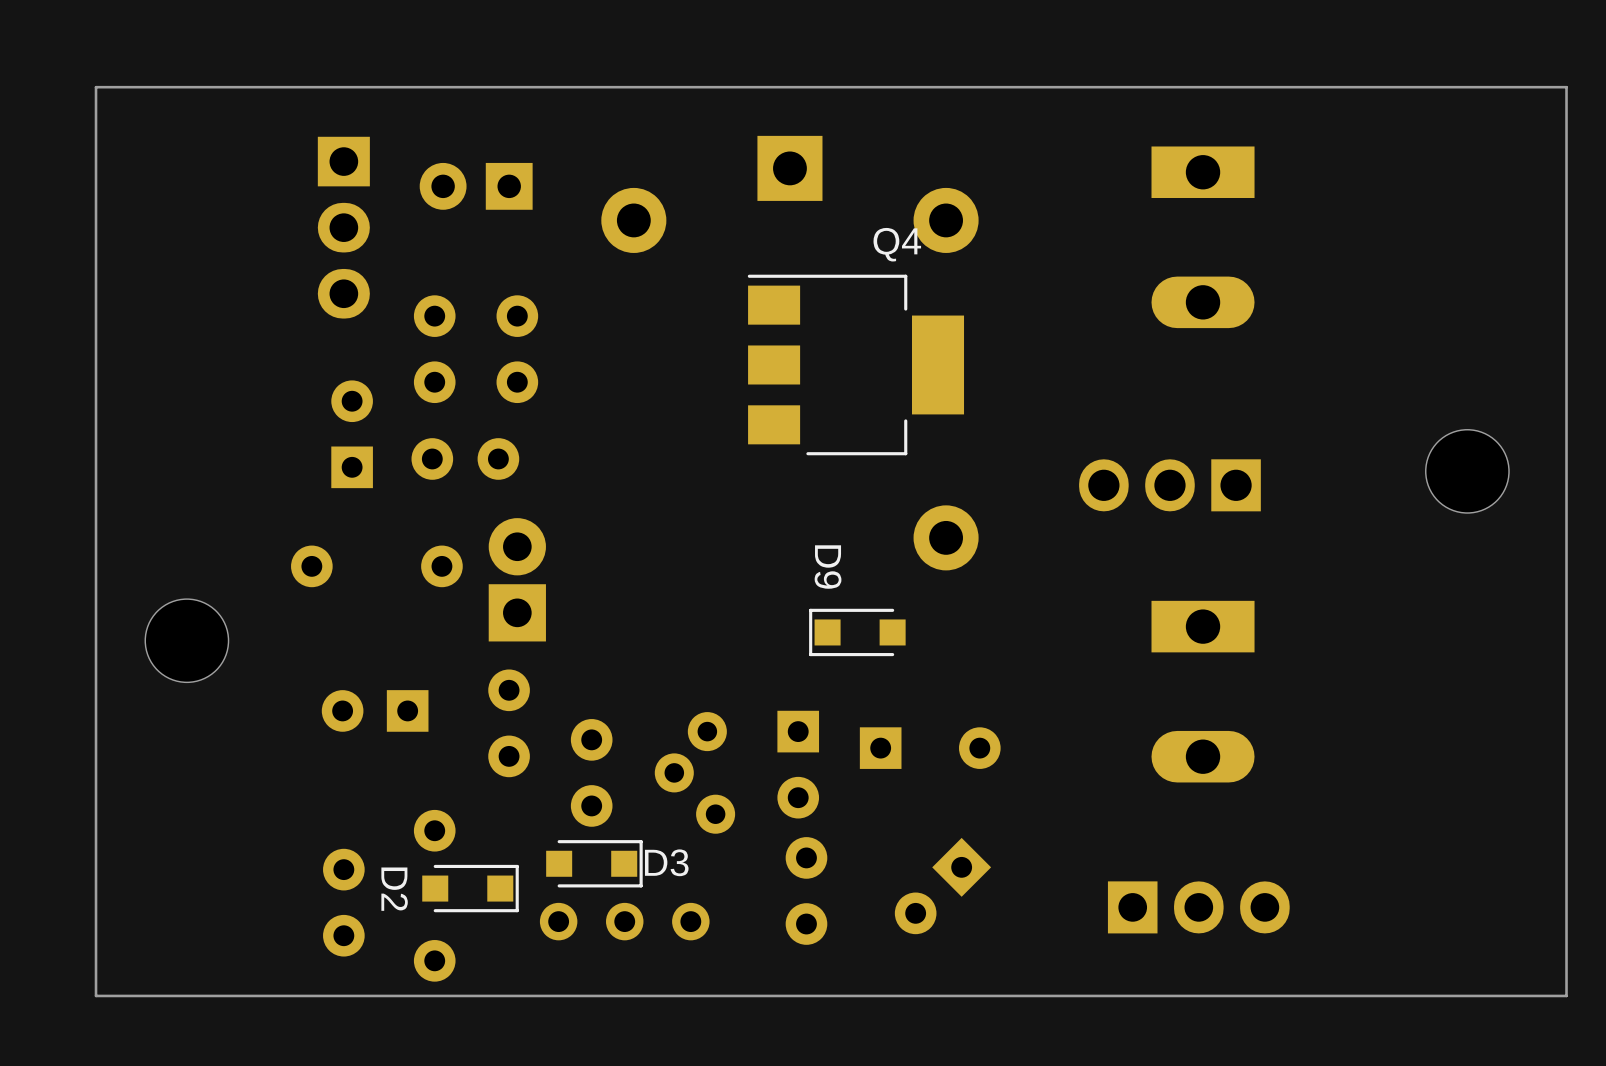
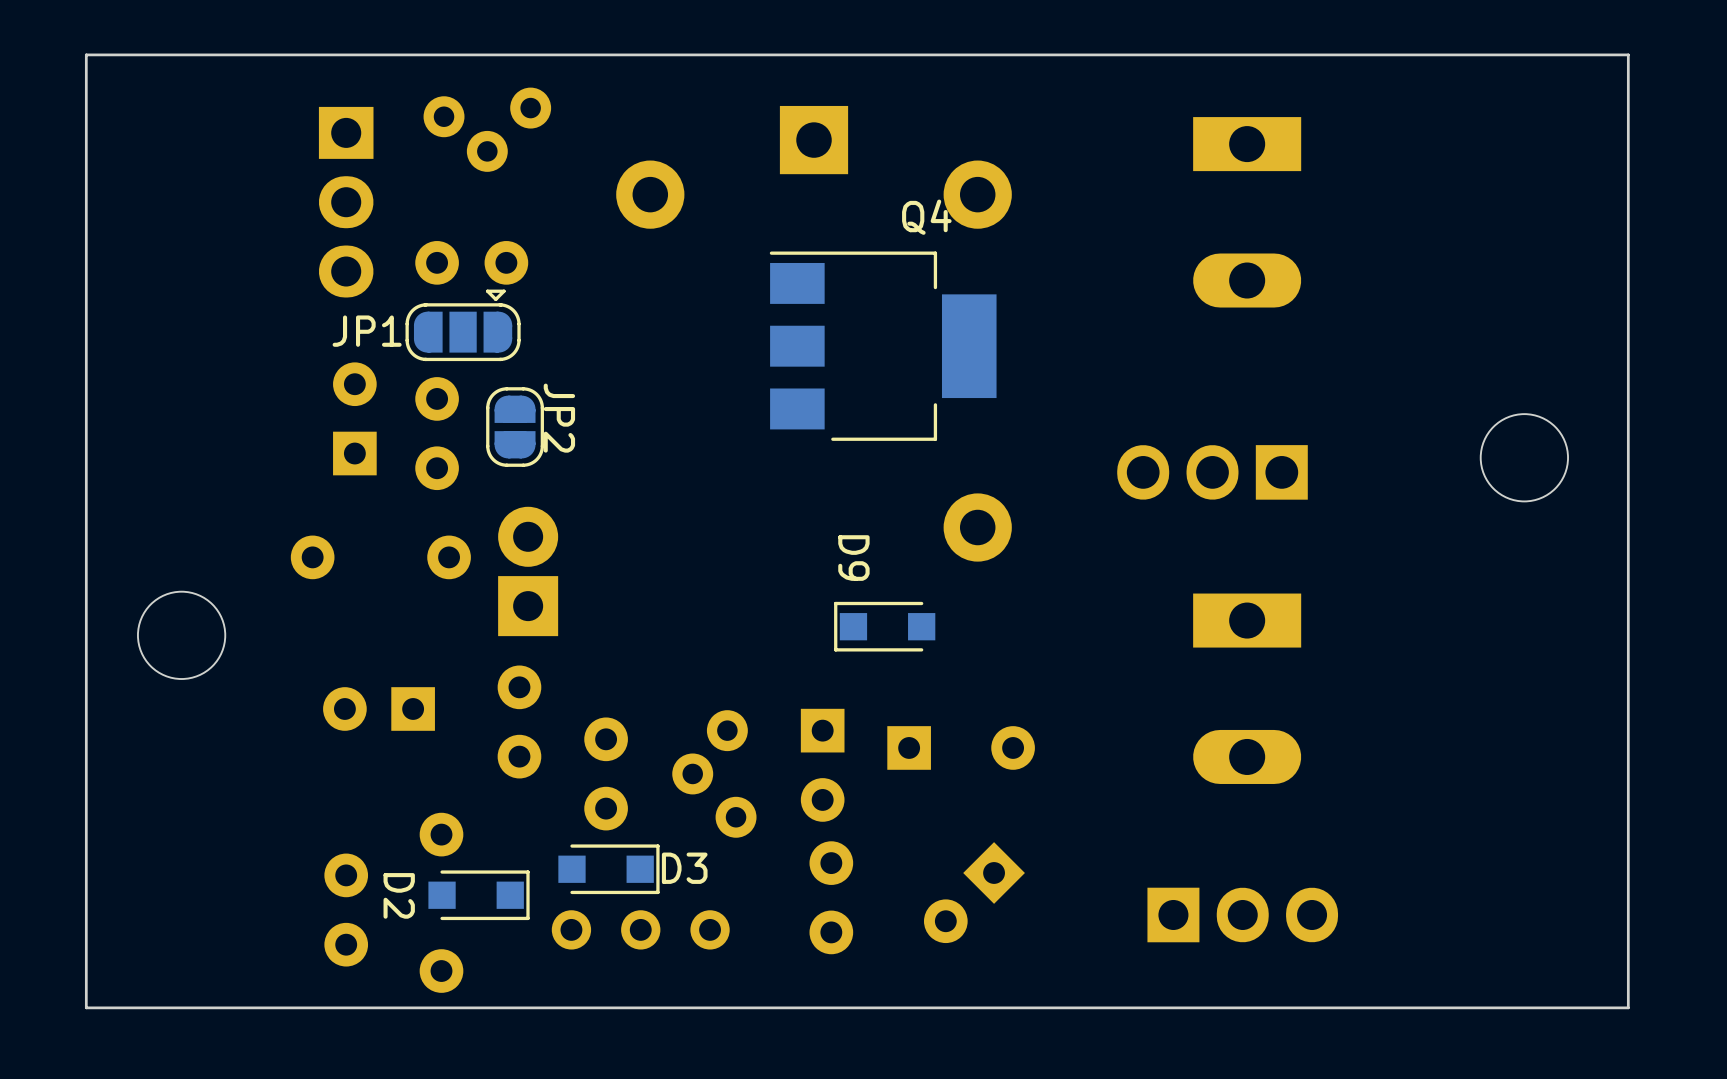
part: none -> (487, 129)
part: (476, 186) -> none
part: none -> (471, 262)
JP1: none -> (463, 325)
part: (434, 349) -> none
part: (517, 349) -> none
JP2: none -> (515, 427)
part rotation: 0° (465, 458) -> 90° clockwise (437, 433)

